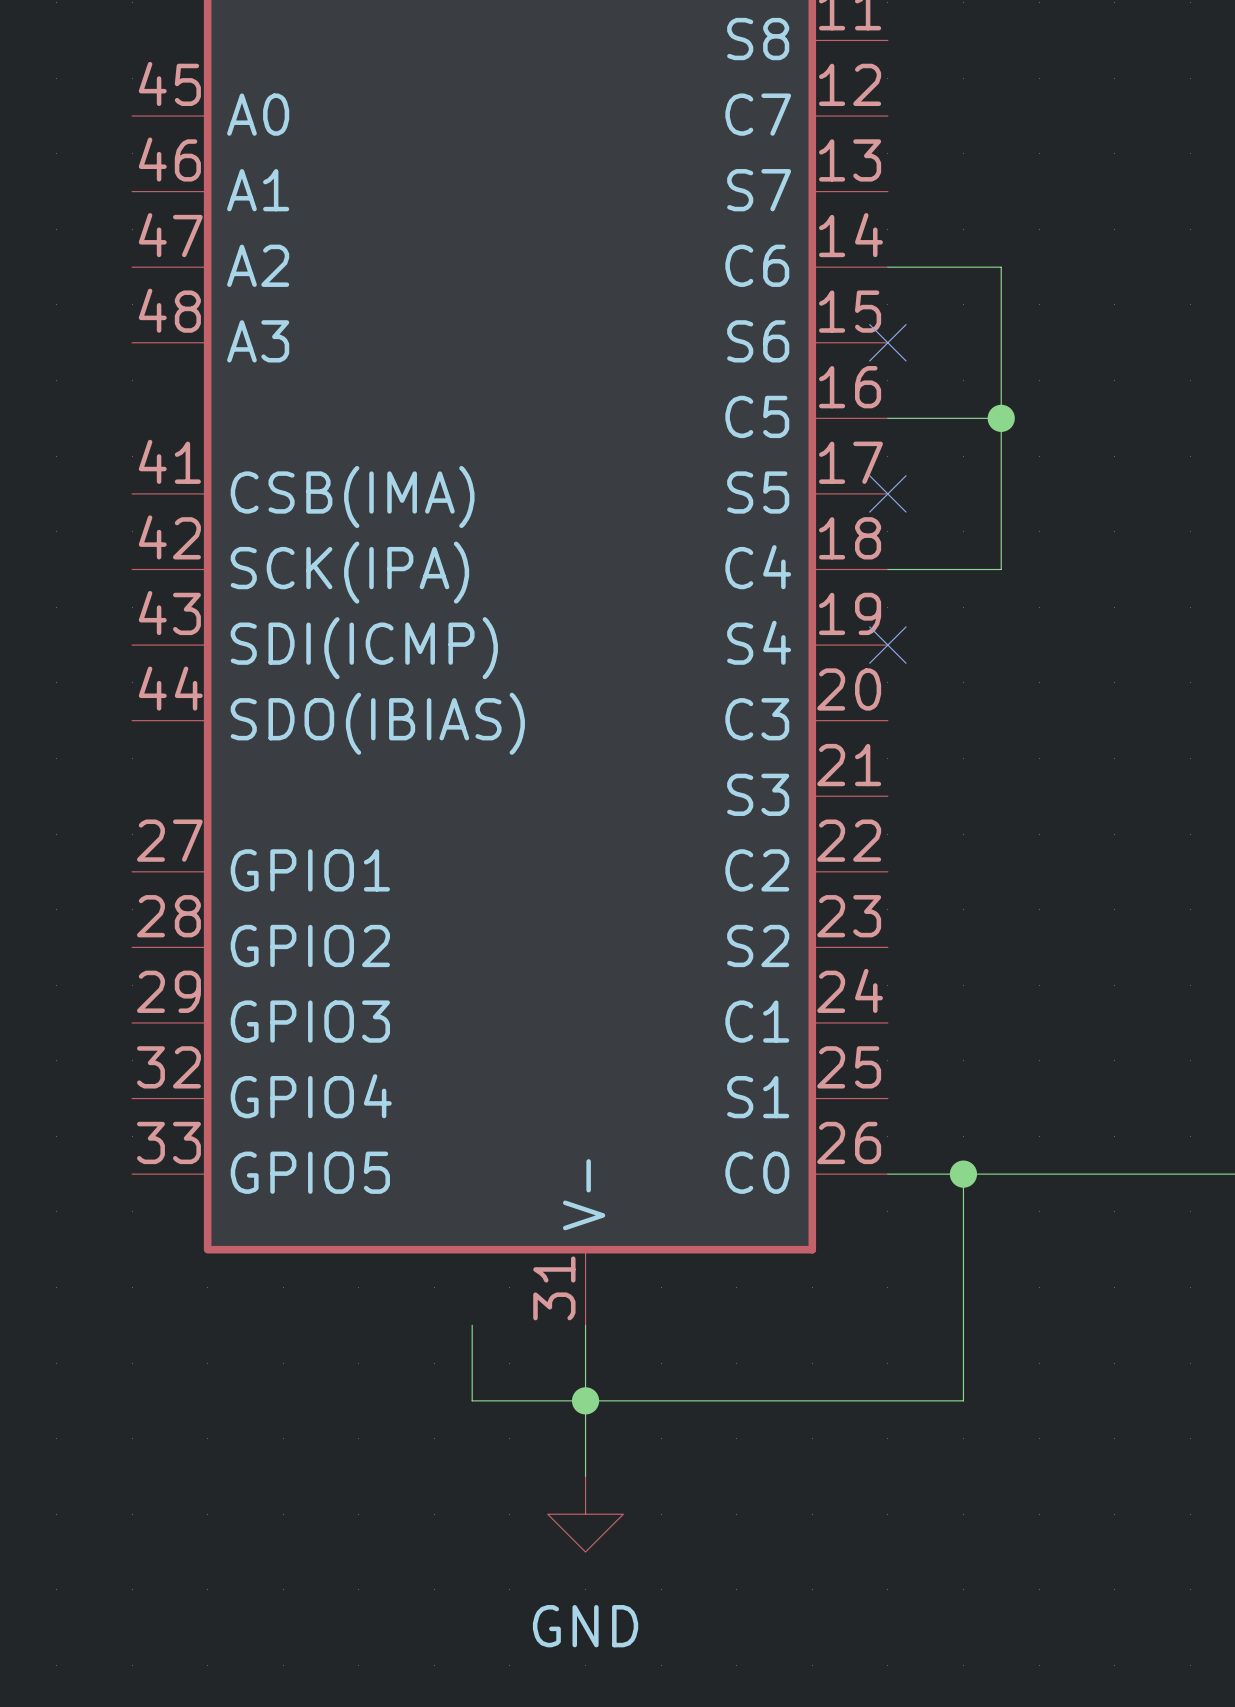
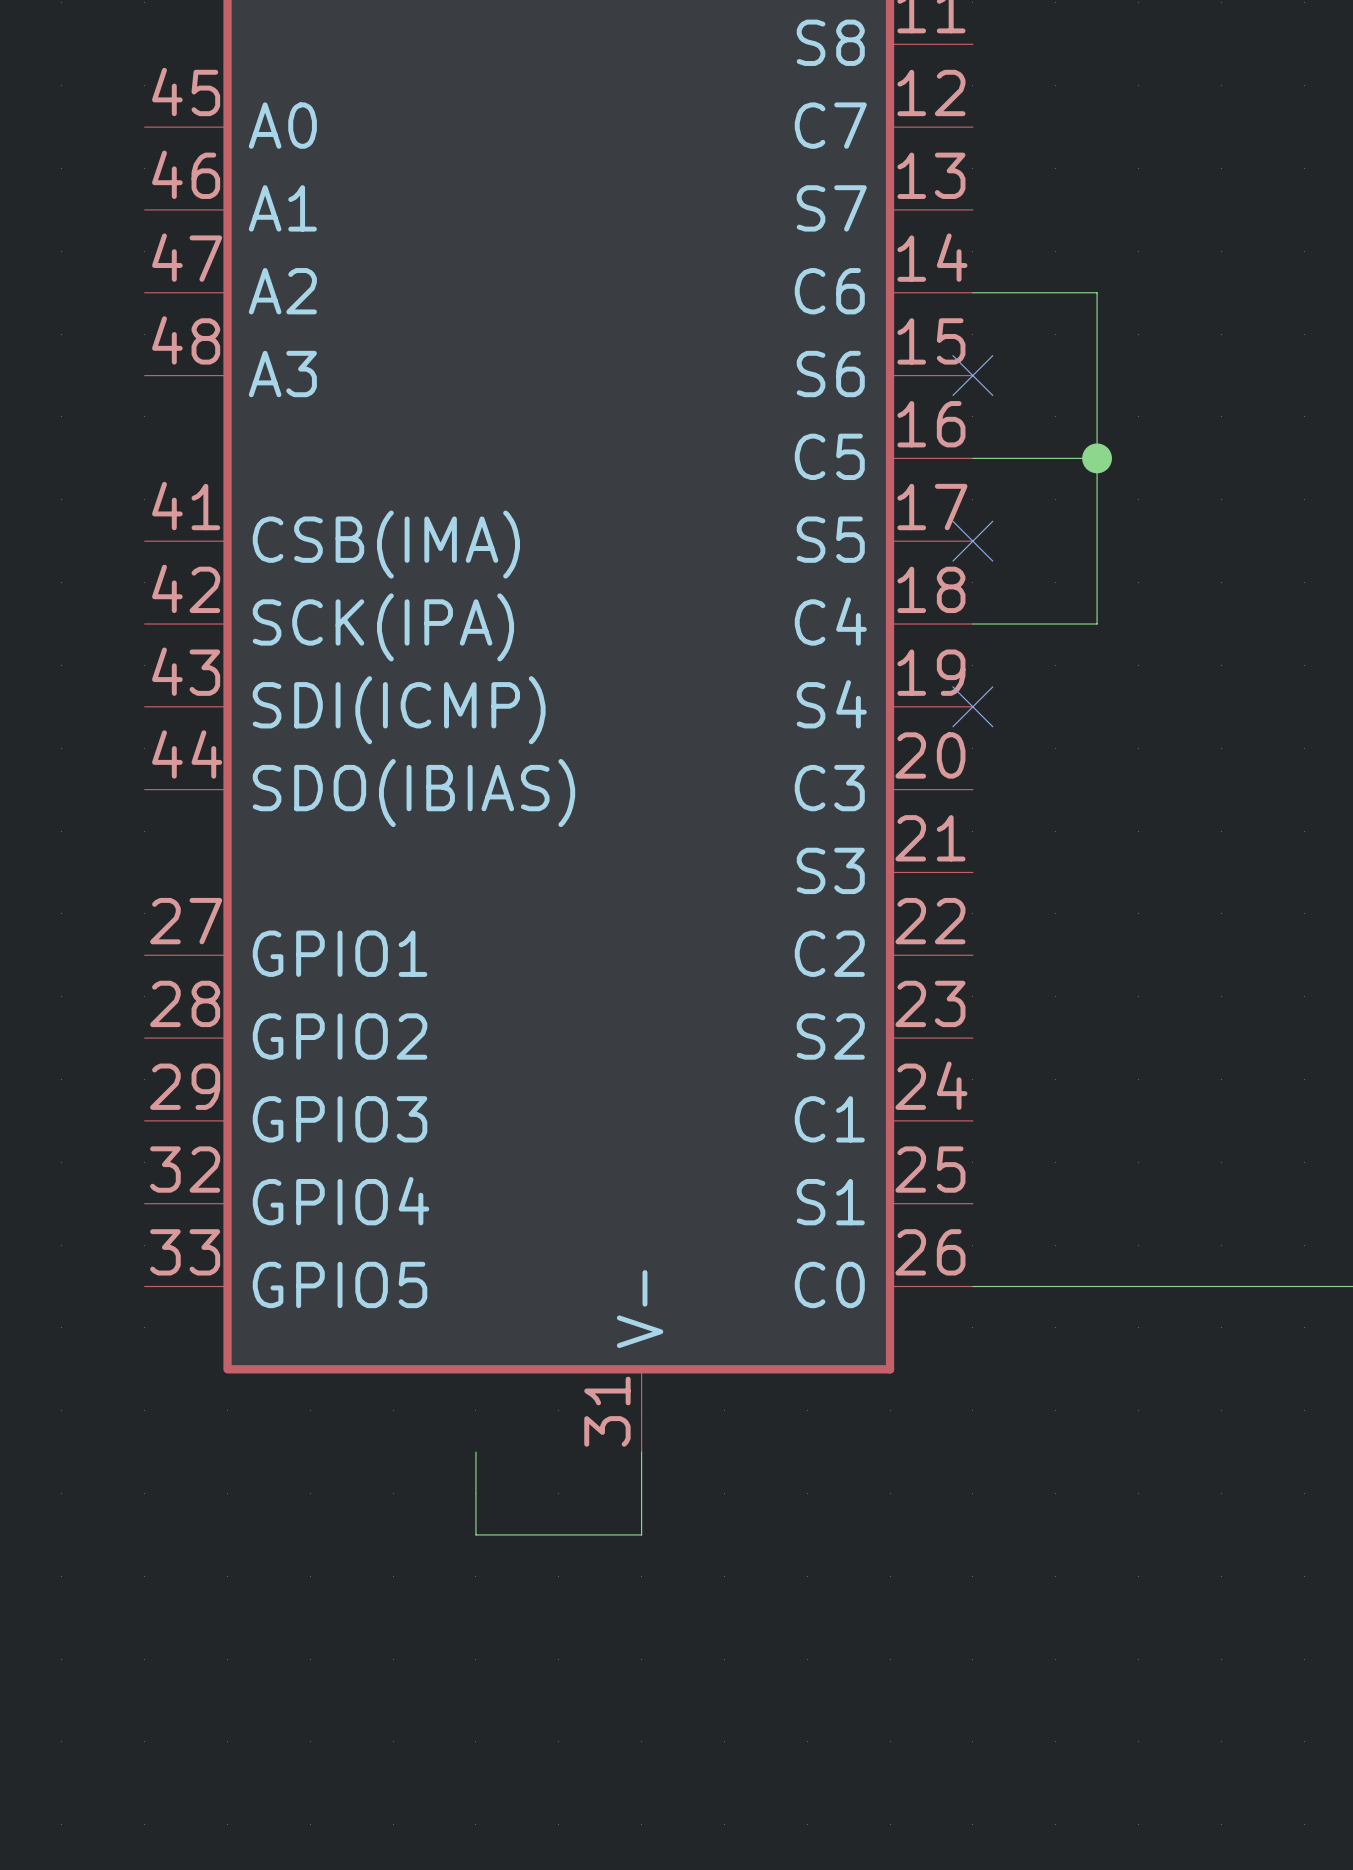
wire: (963, 1174) (963, 1400) (585, 1400) (585, 1476) -> none
junction: (963, 1174) -> none
wire: (472, 1325) (472, 1400) -> (475, 1452) (475, 1534) (517, 1534)
junction: (585, 1400) -> none
power symbol: GND (585, 1514) -> none

